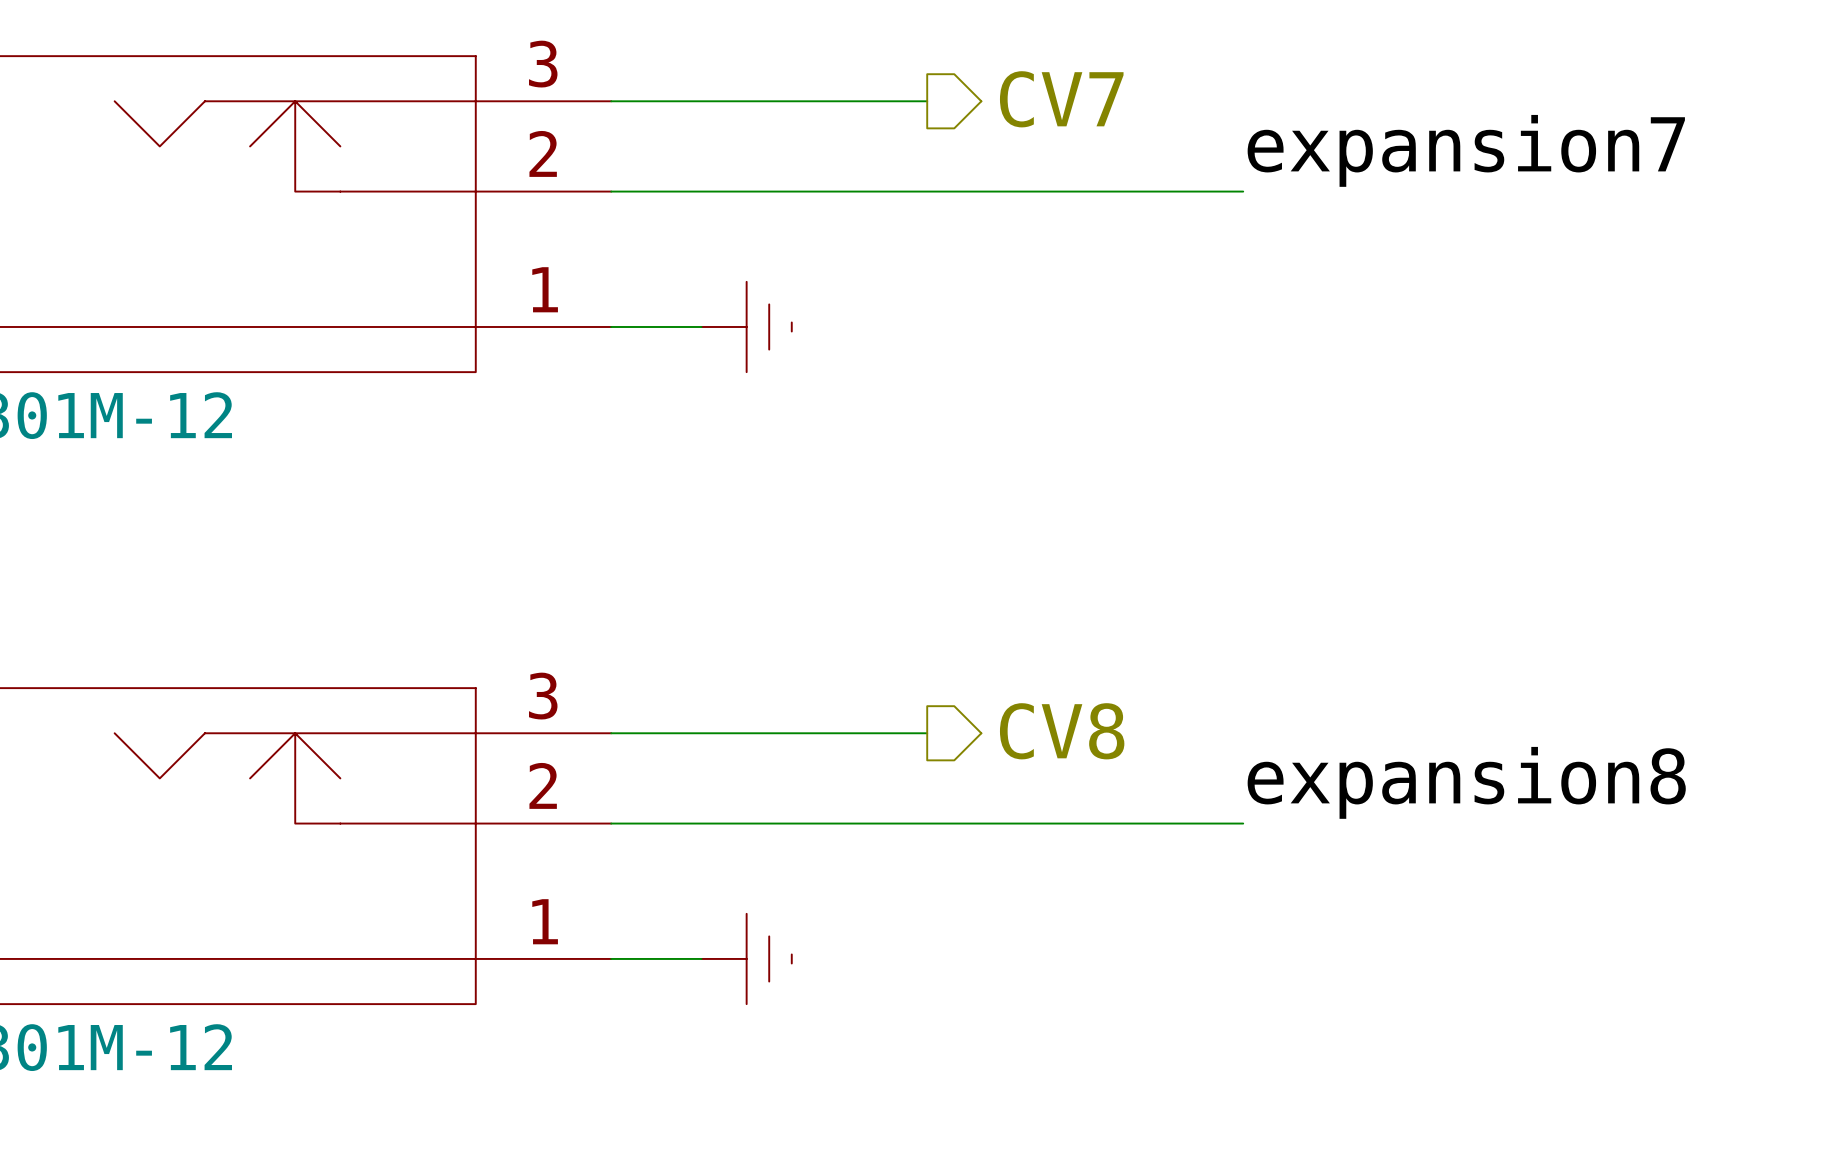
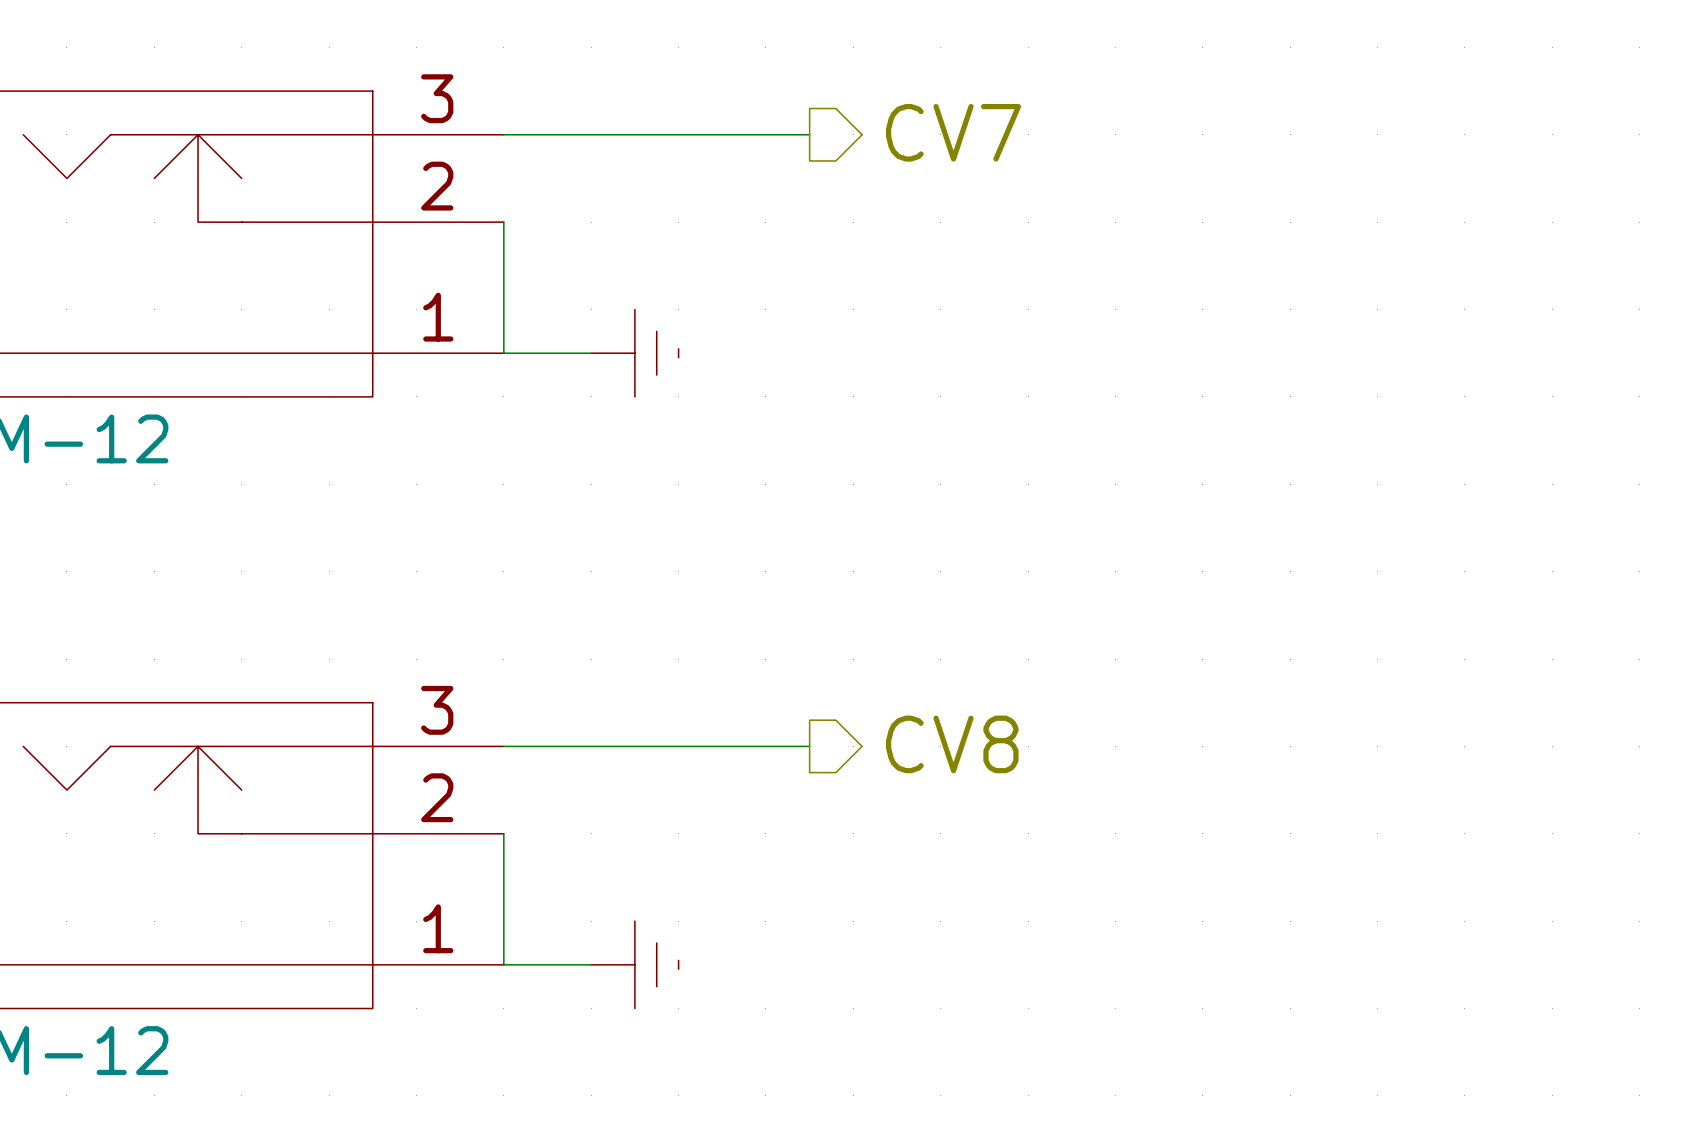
label: expansion7 (1466, 150) -> none
wire: (611, 191) (1243, 191) -> (503, 222) (503, 353)
label: expansion8 (1466, 782) -> none
wire: (611, 823) (1243, 823) -> (503, 833) (503, 964)

